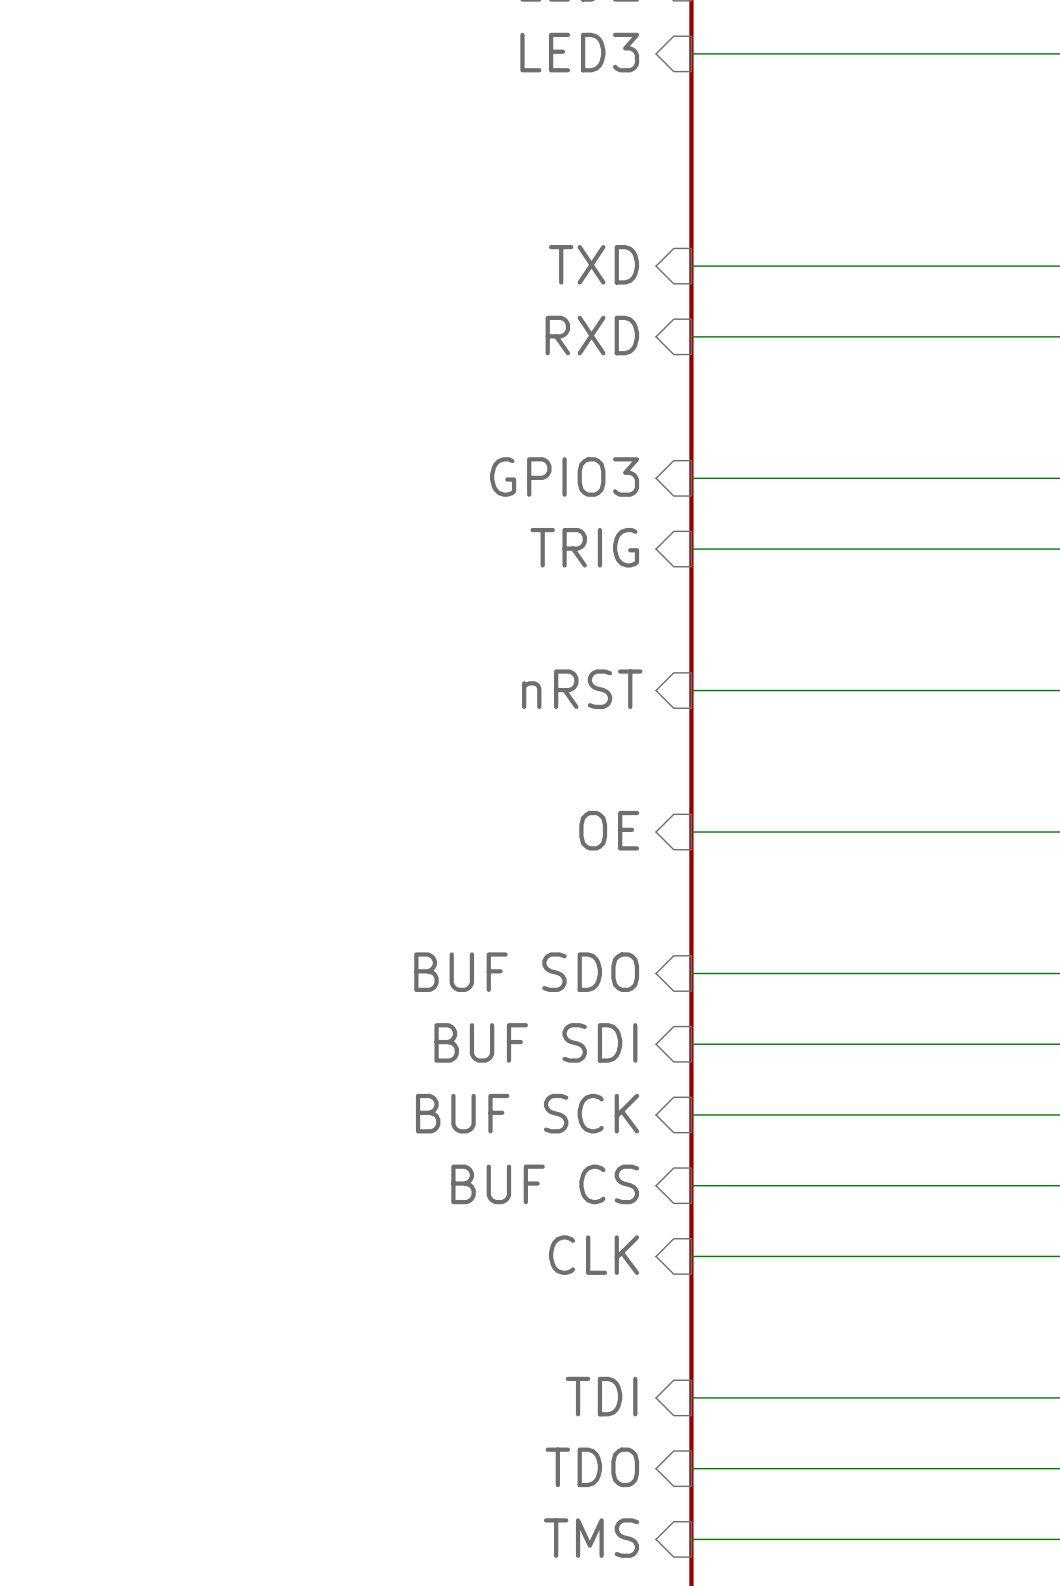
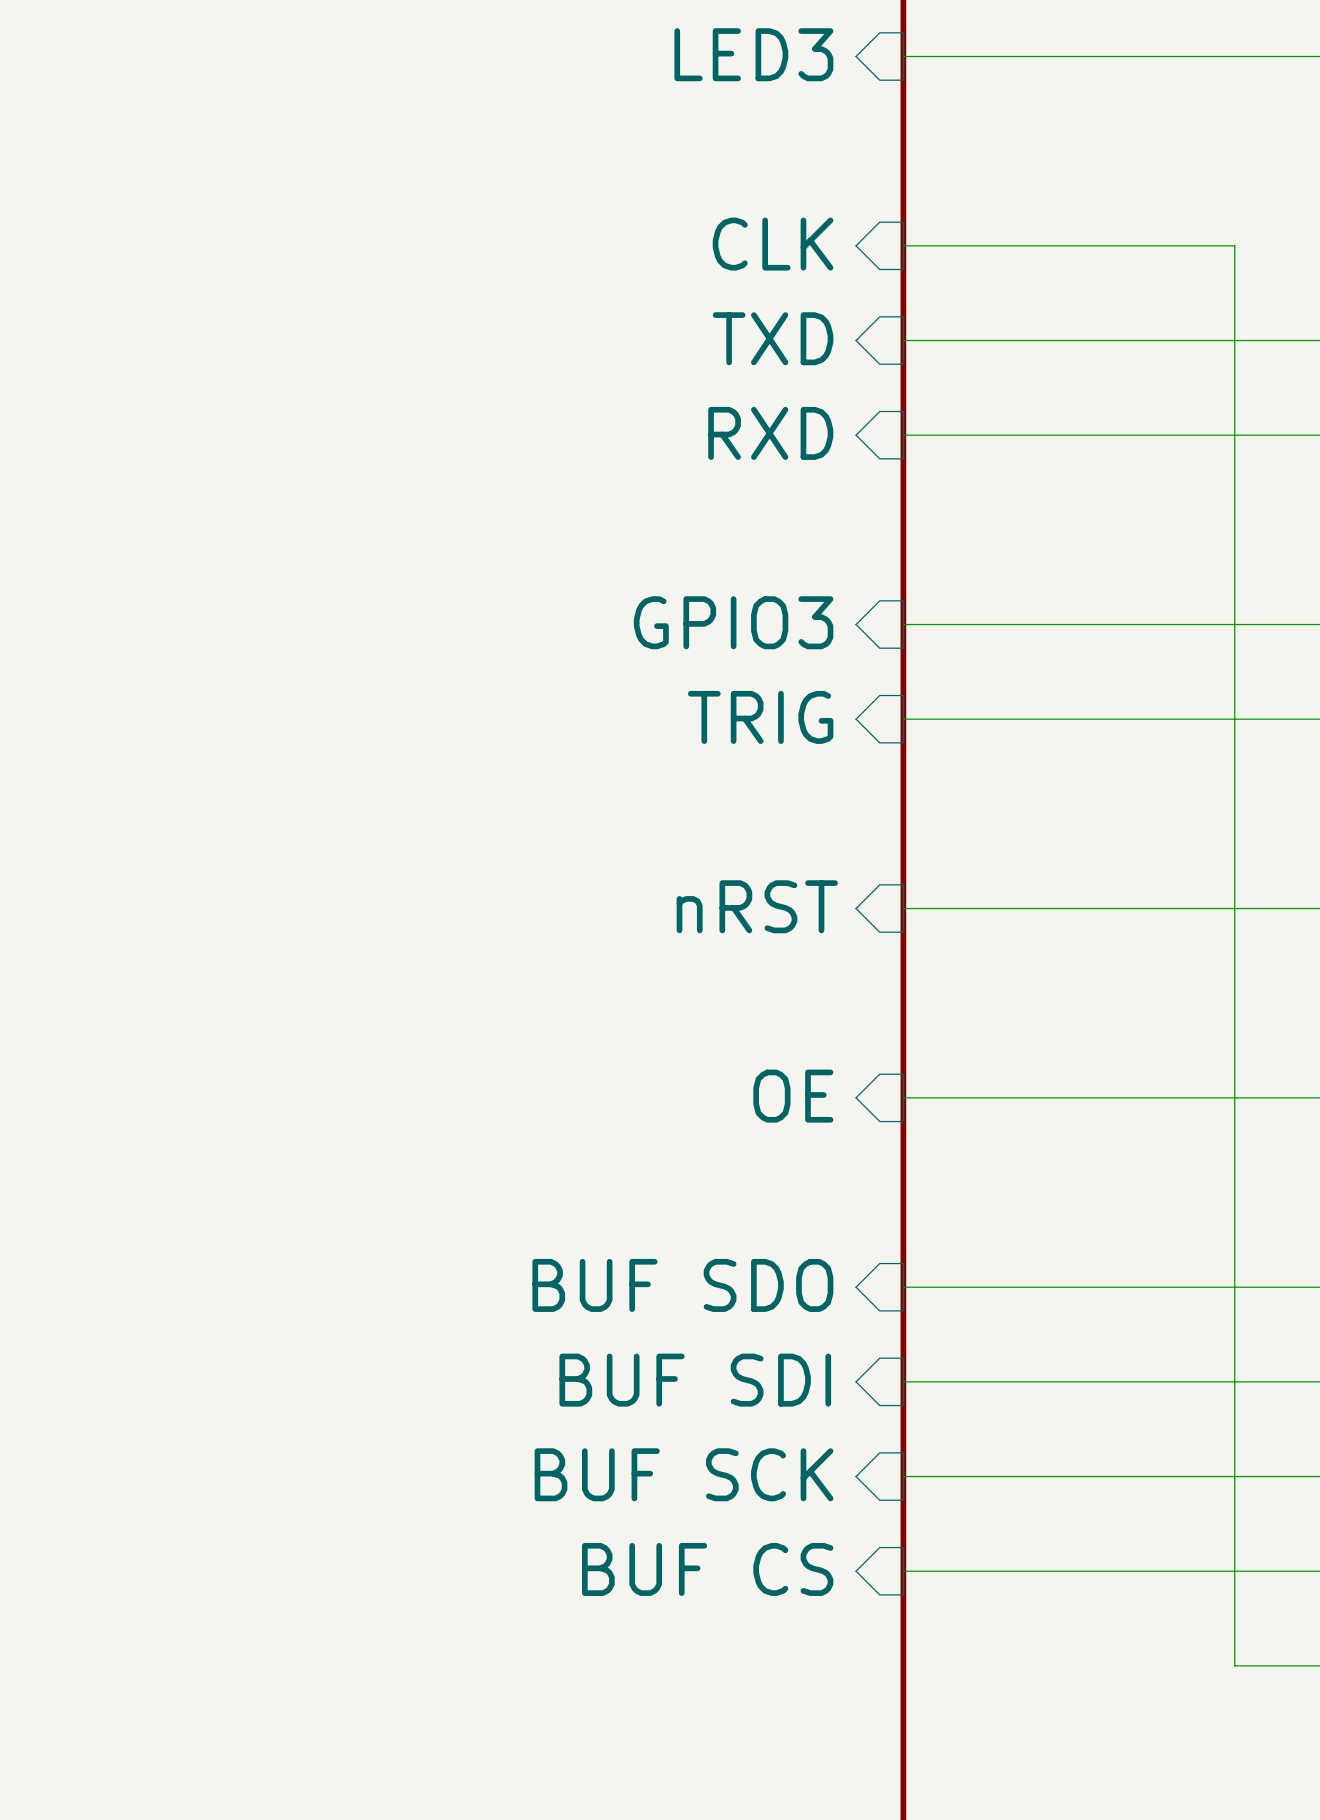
sheet pin: none -> CLK (773, 244)
sheet pin: CLK (594, 1255) -> none
wire: (691, 1256) (939, 1256) -> (903, 245) (1234, 245) (1234, 1665)

